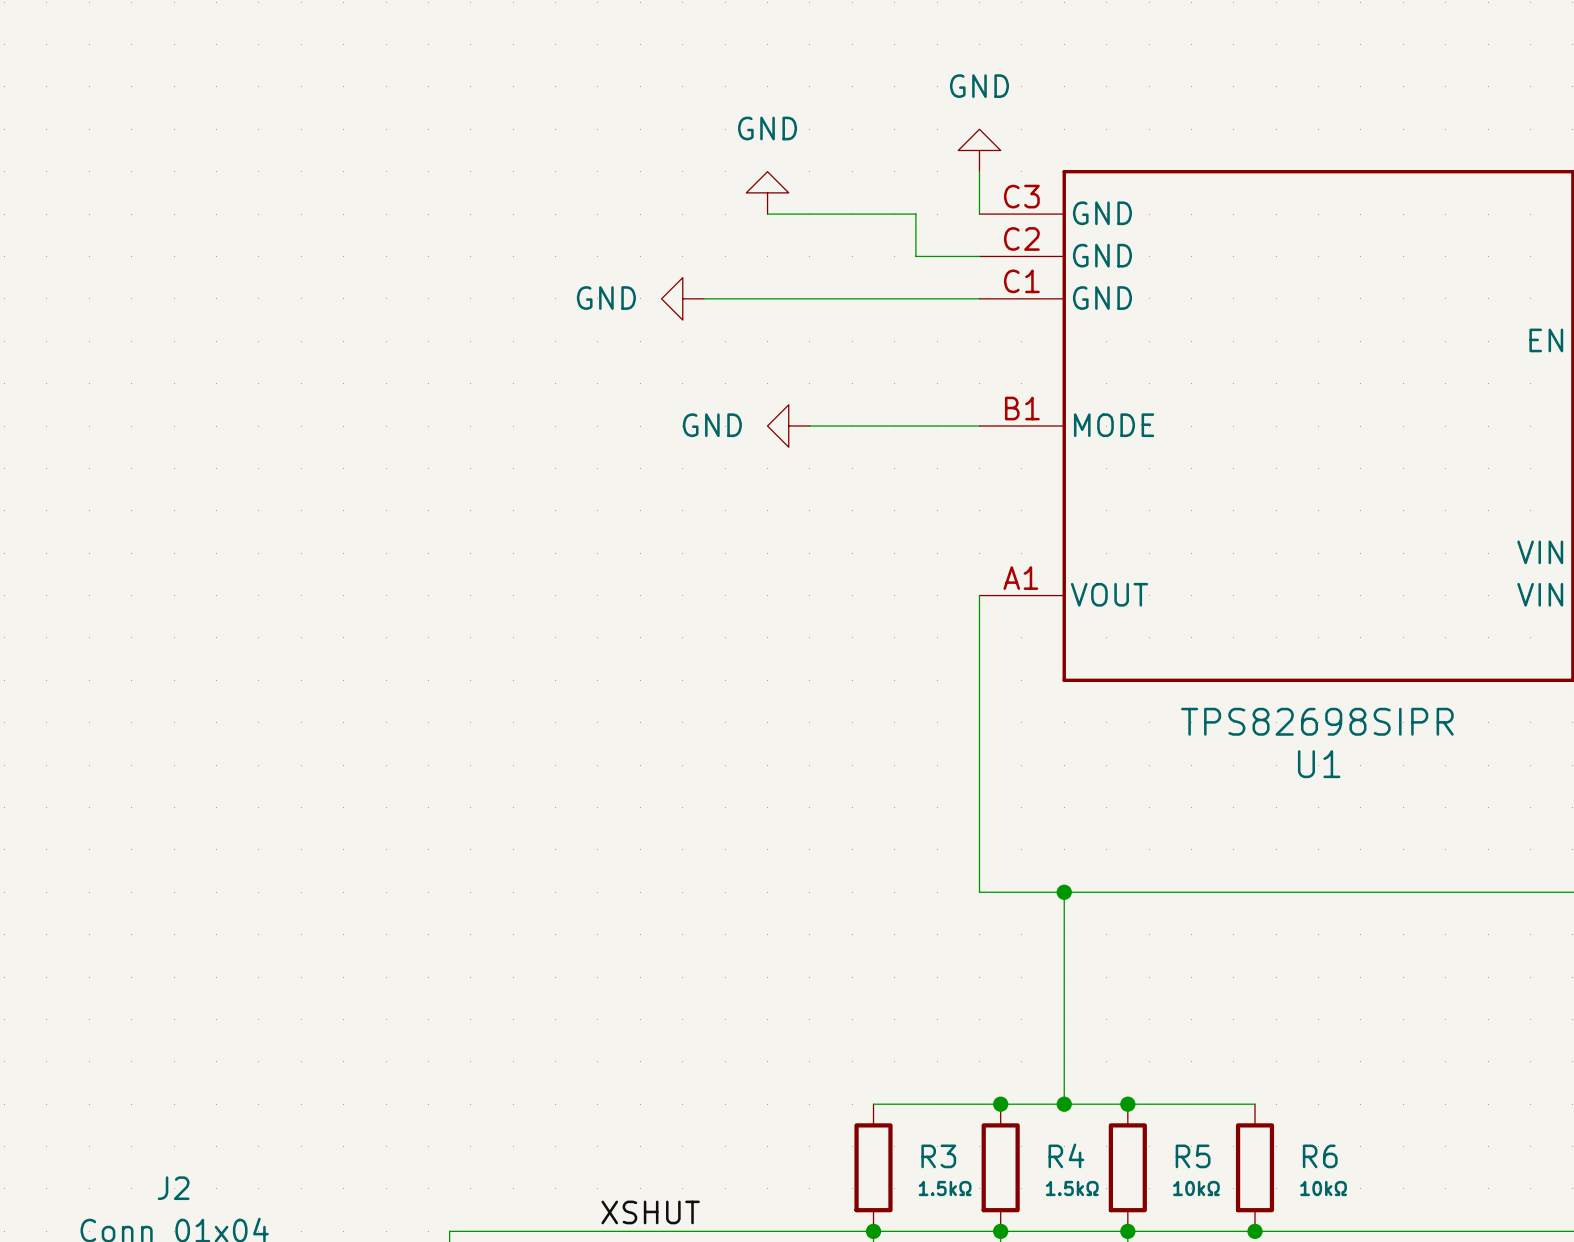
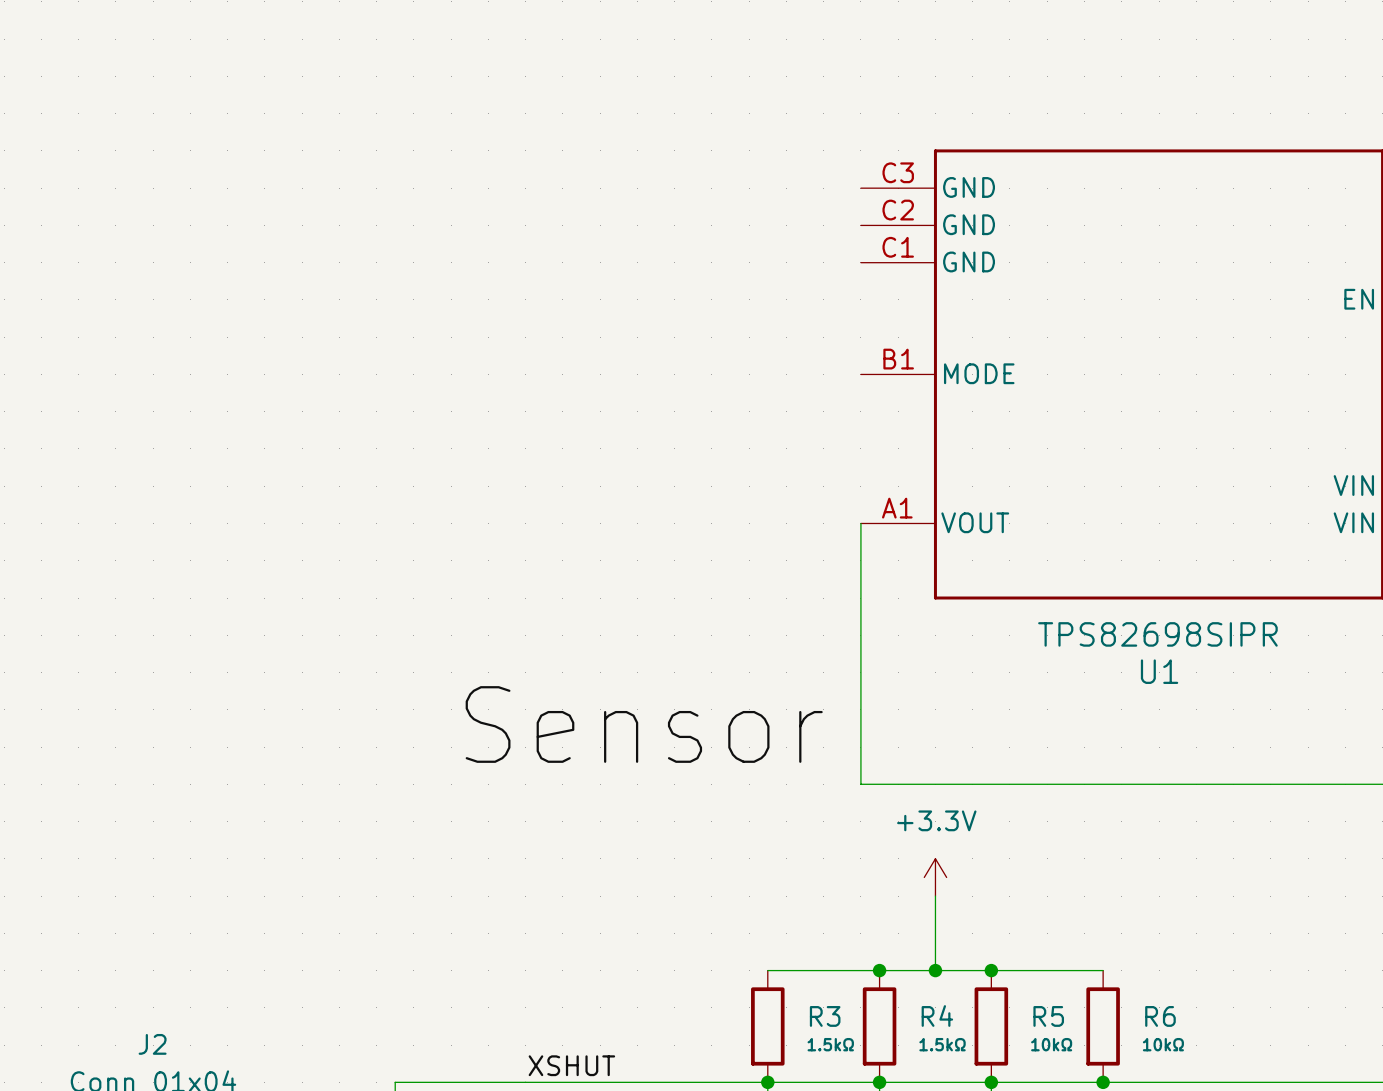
power symbol: GND (979, 150) -> none
wire: (979, 171) (979, 214) -> none
power symbol: GND (767, 192) -> none
wire: (767, 214) (915, 214) (915, 256) (979, 256) -> none
power symbol: GND (682, 298) -> none
wire: (703, 298) (979, 298) -> none
power symbol: GND (788, 426) -> none
wire: (809, 426) (979, 426) -> none
label: none -> Sensor (644, 724)
wire: (1064, 892) (1064, 1019) -> none
junction: (1064, 892) -> none
power symbol: none -> +3.3V (935, 877)

